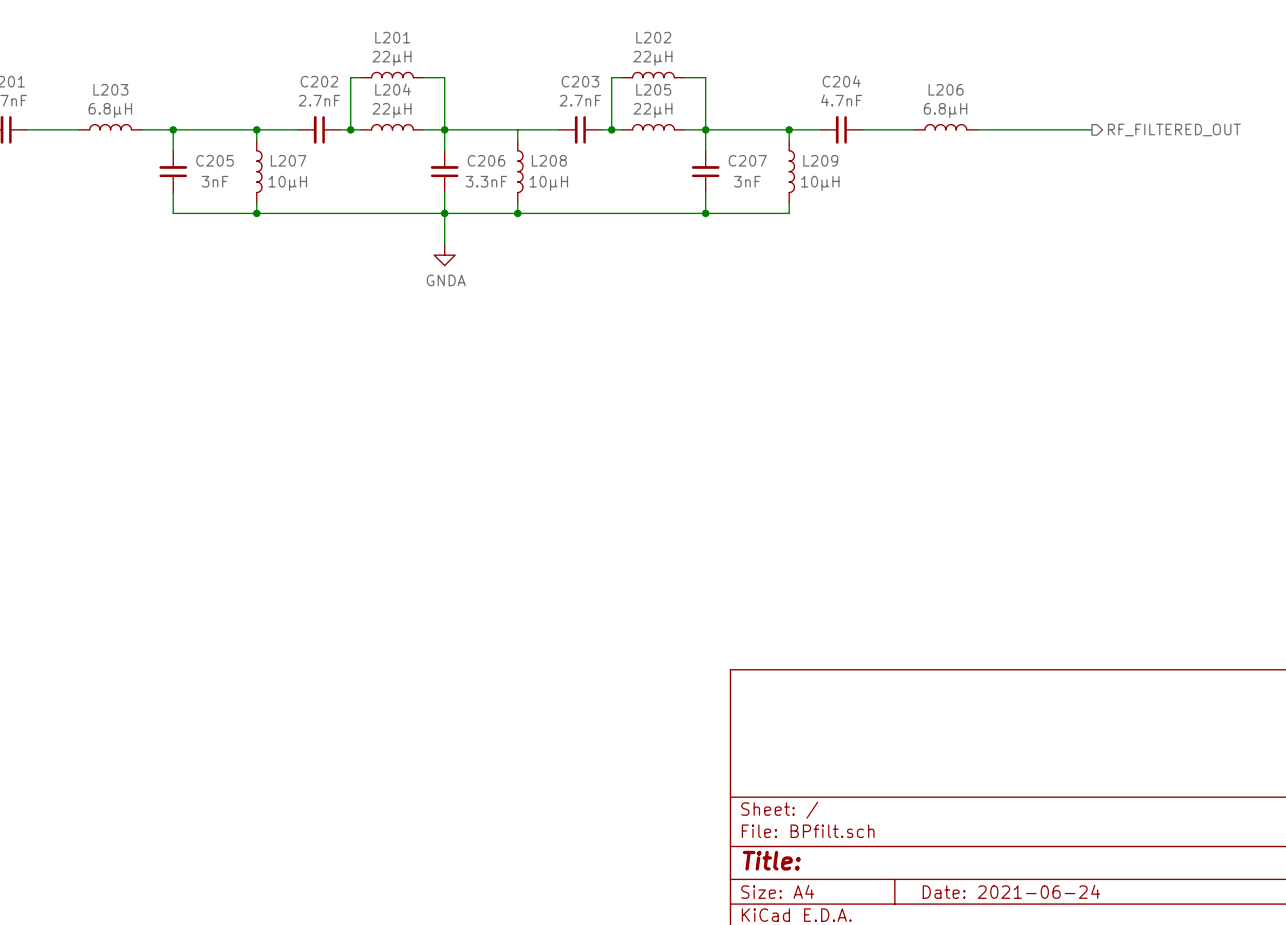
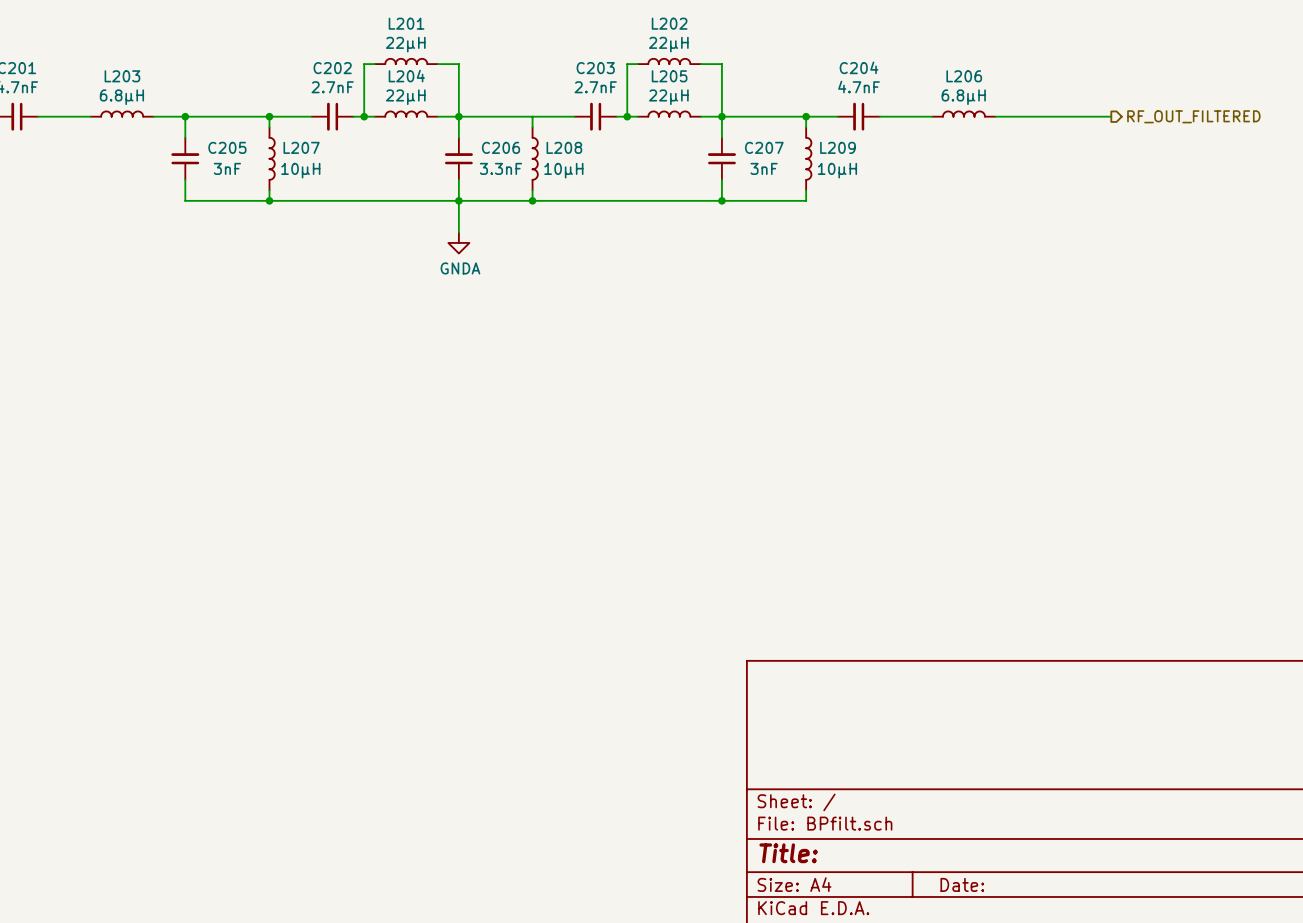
hierarchical label: RF_FILTERED_OUT (1174, 129) -> RF_OUT_FILTERED (1193, 116)
title block: Date: 2021-06-24 (1011, 891) -> Date: (962, 884)

